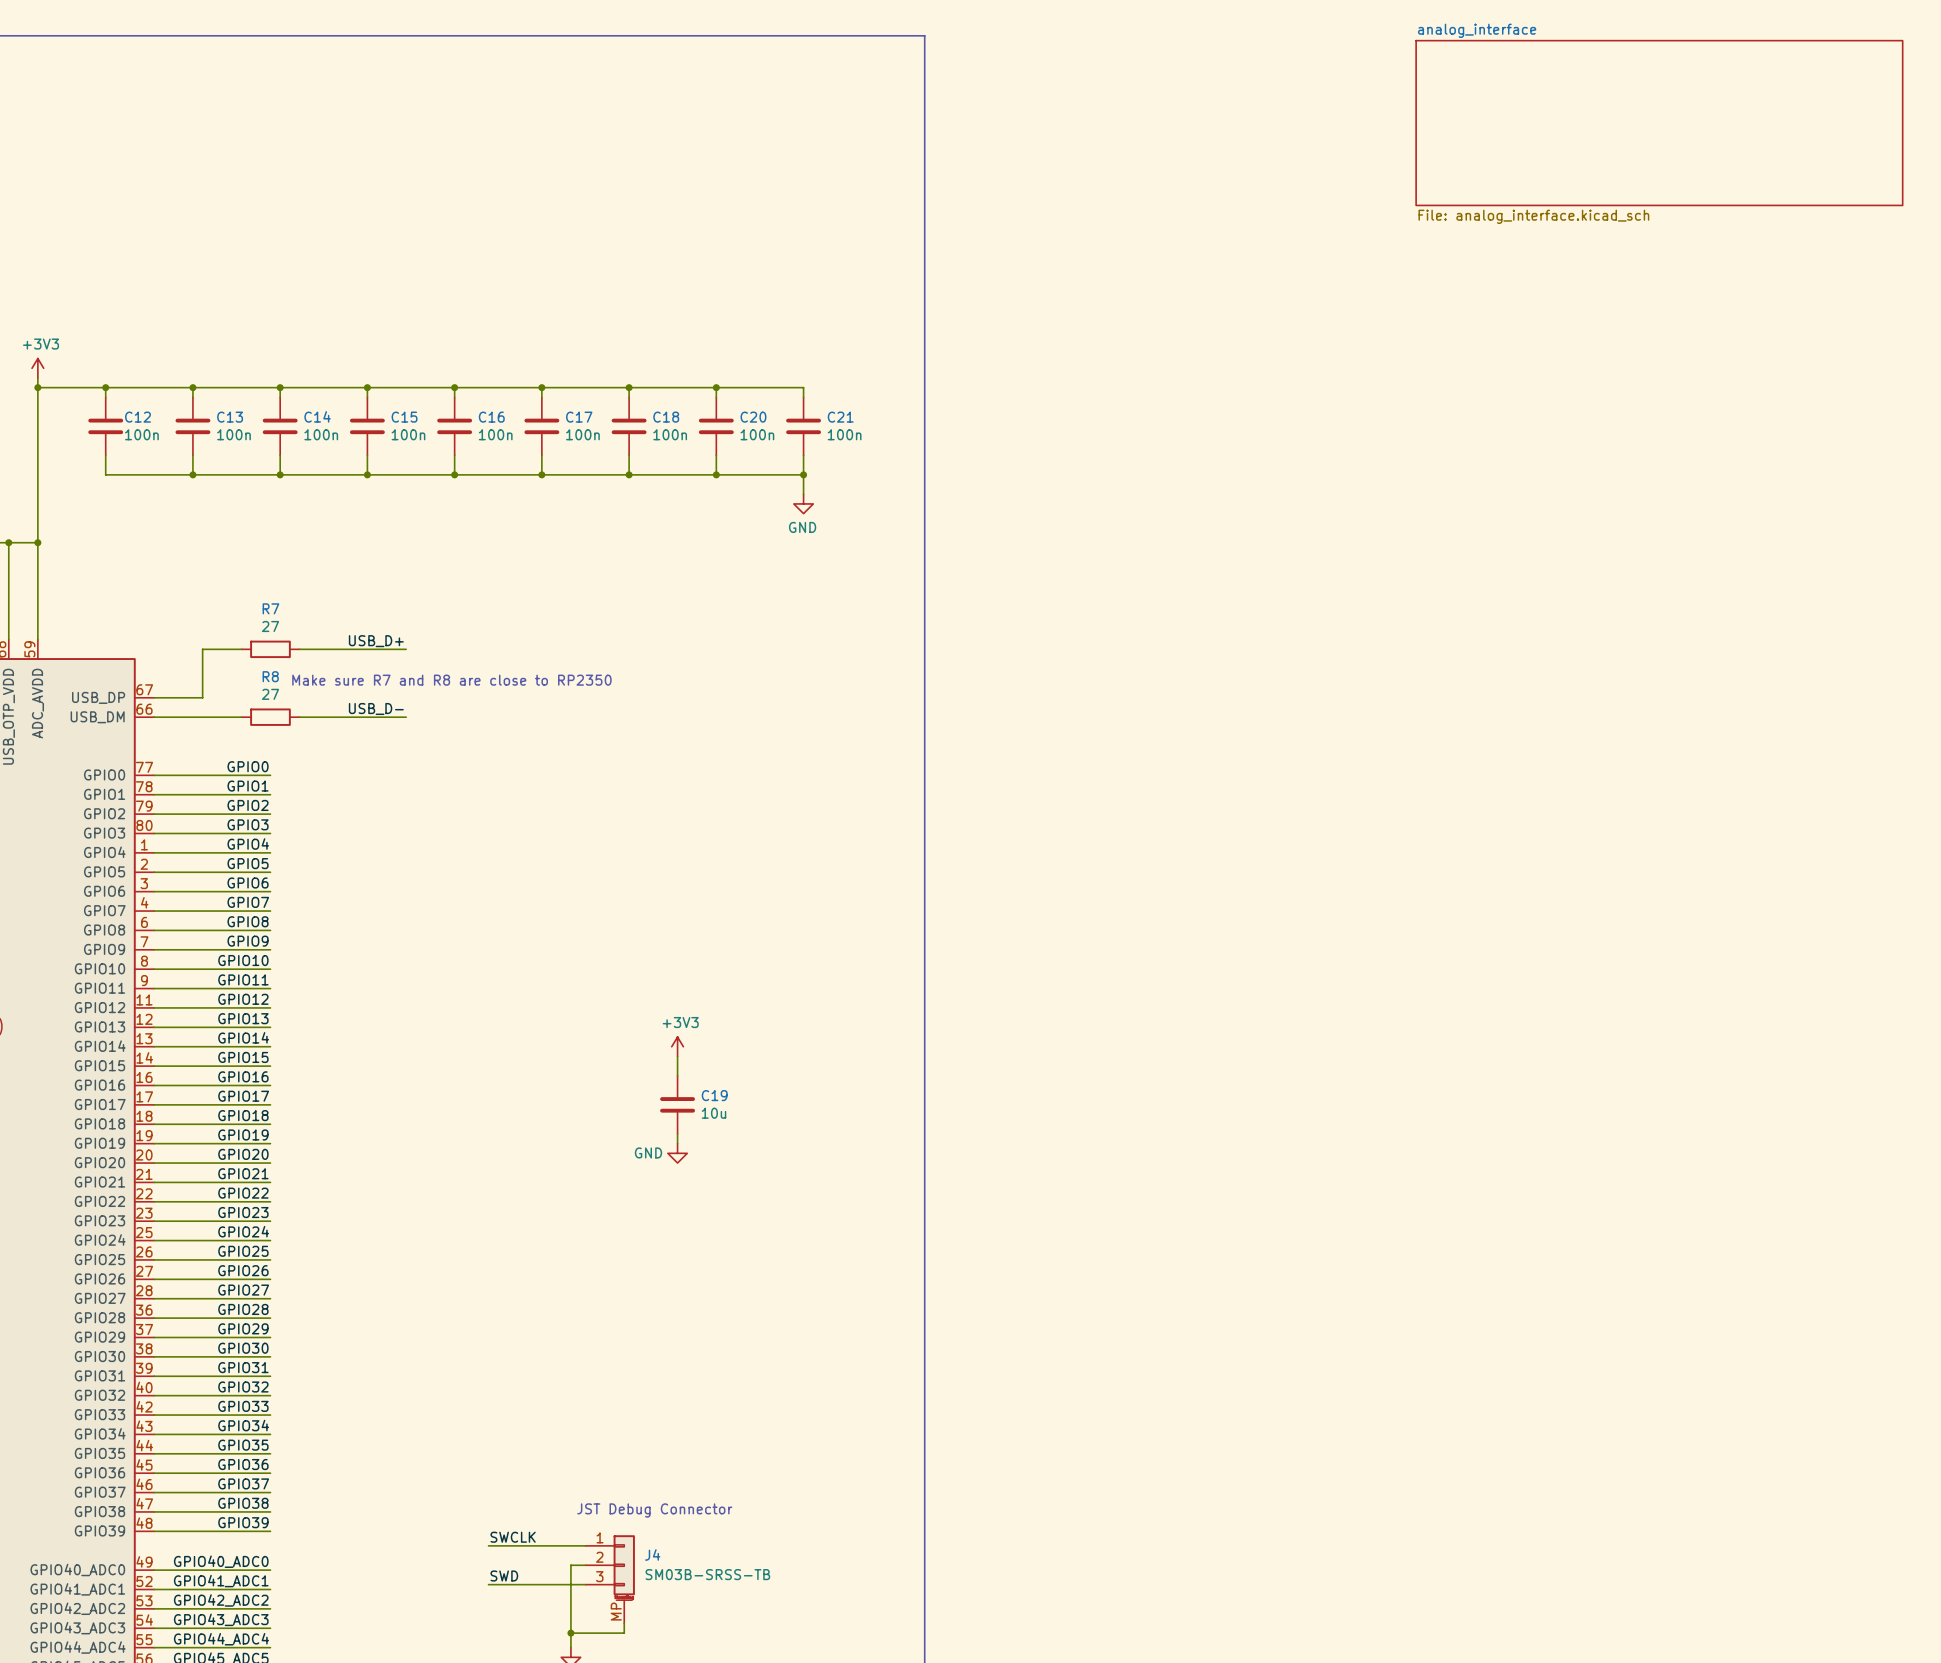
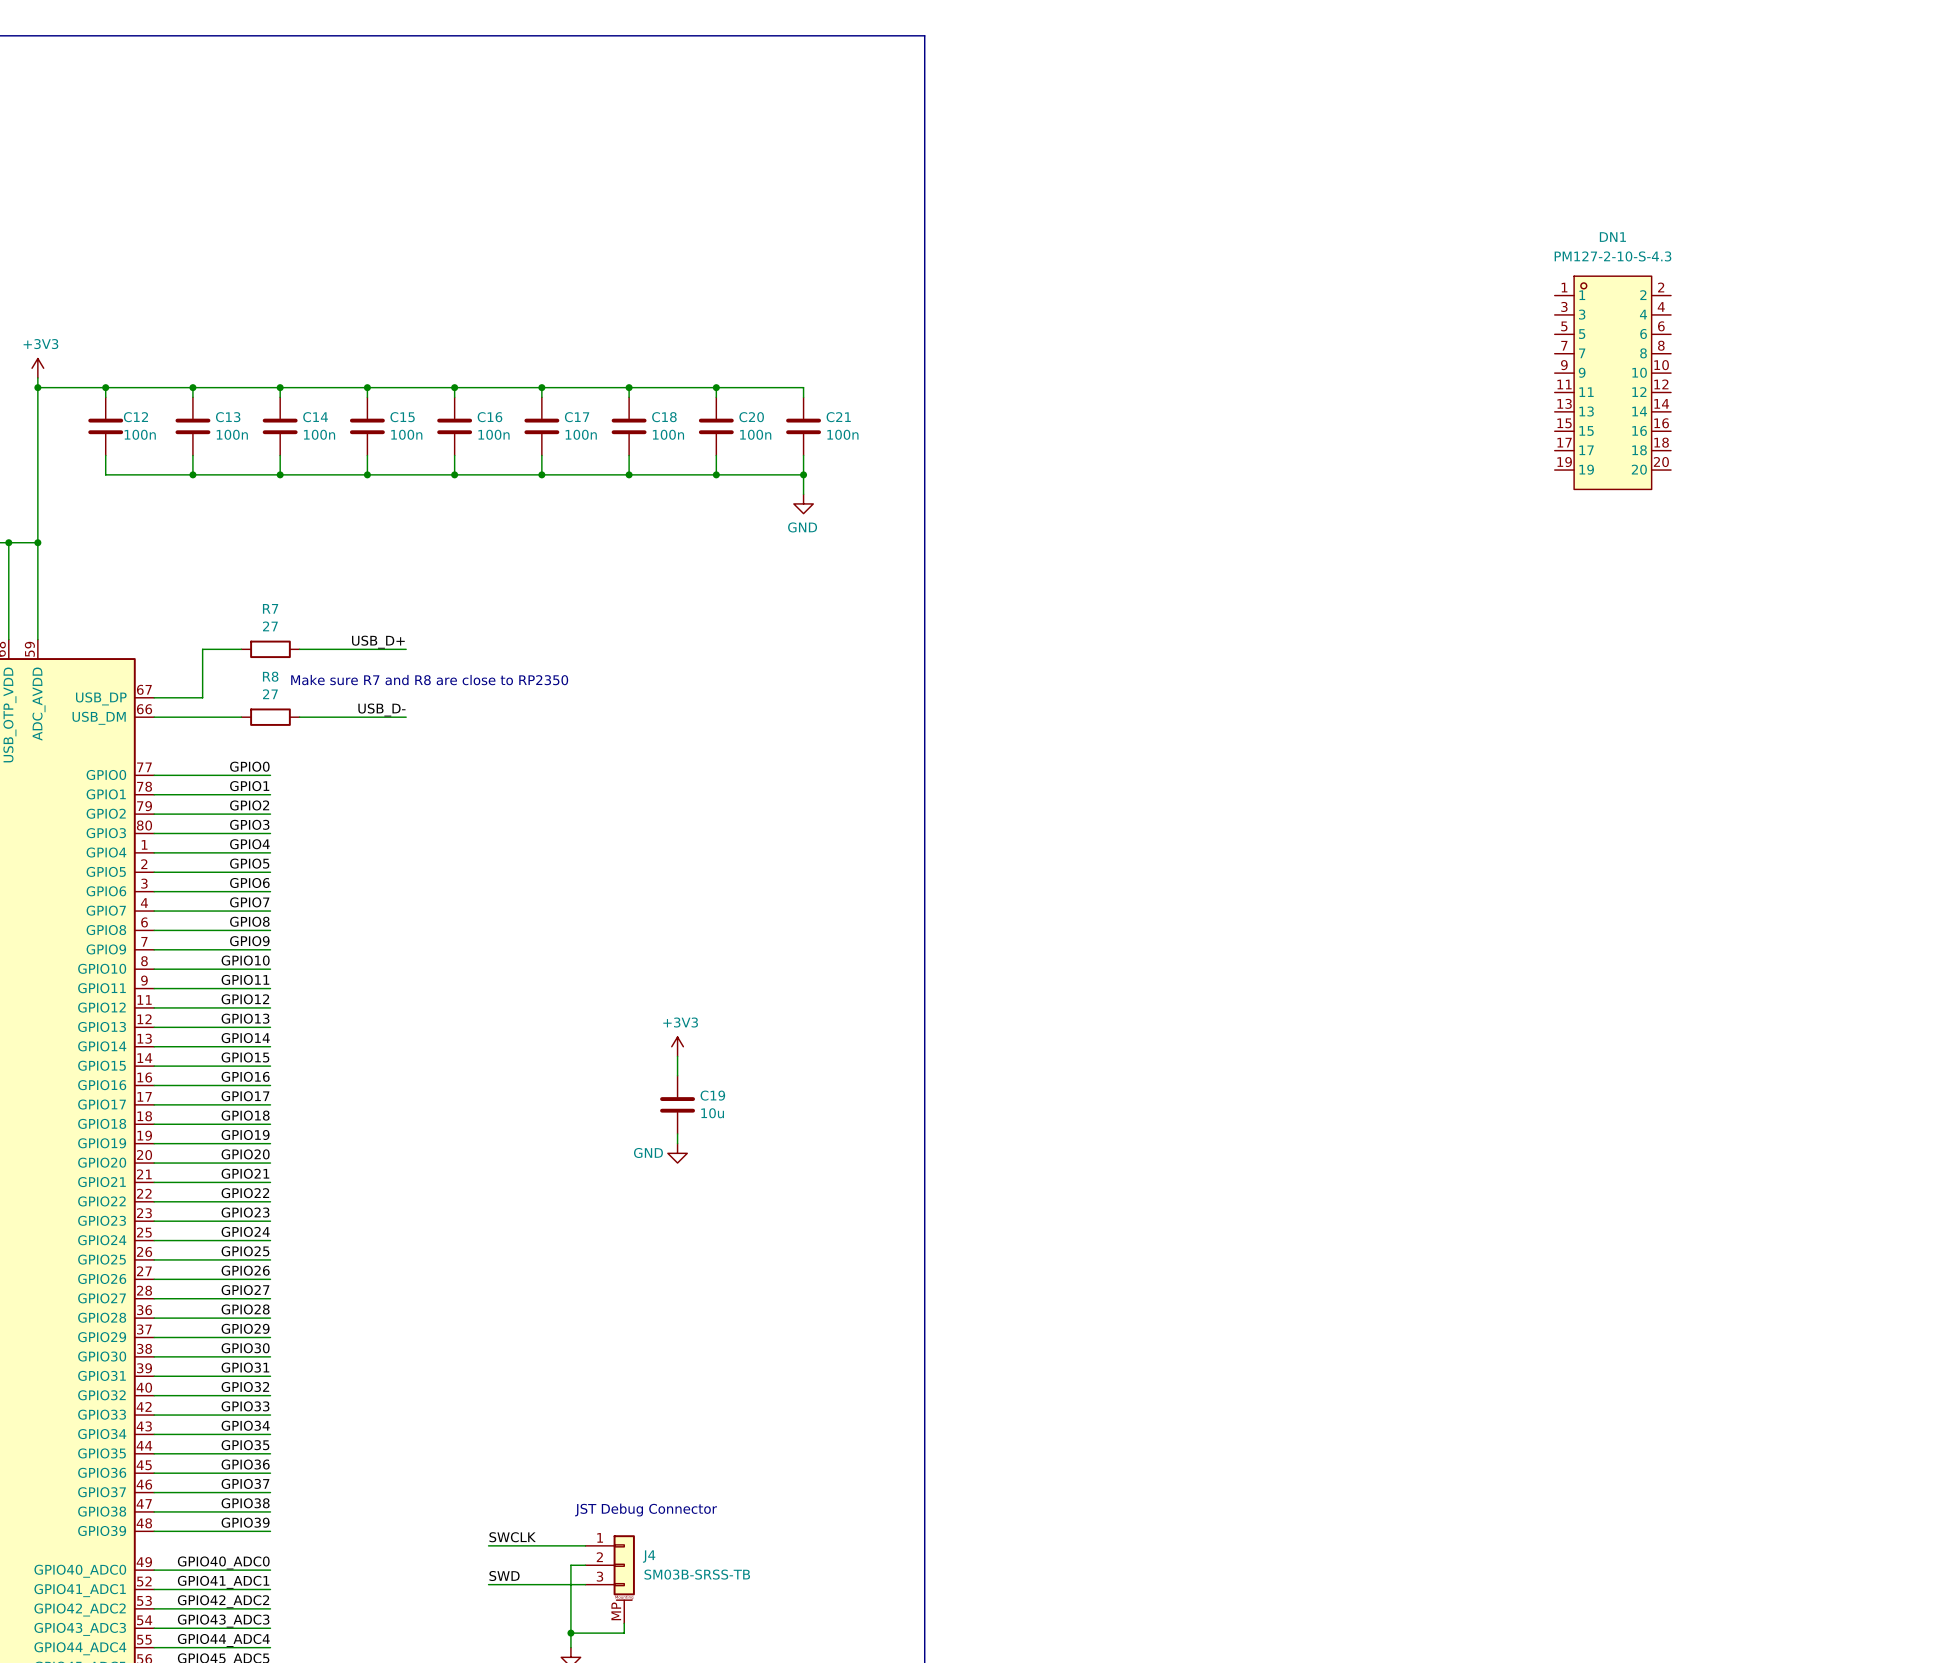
sheet analog_interface: File: analog_interface.kicad_sch (1659, 123) -> none
DN1: none -> PM127-2-10-S-4.3 (1612, 382)

